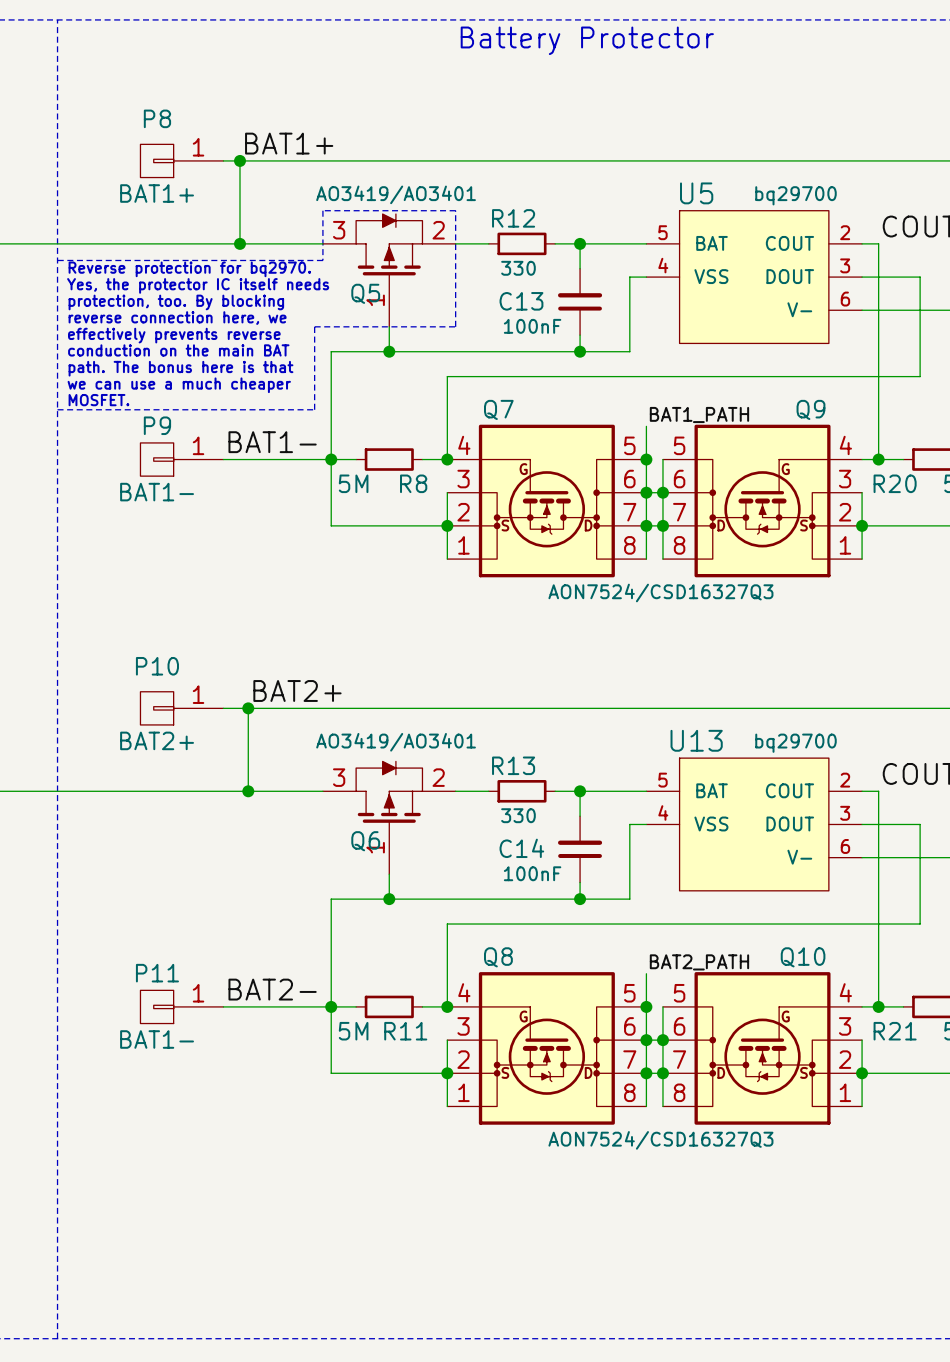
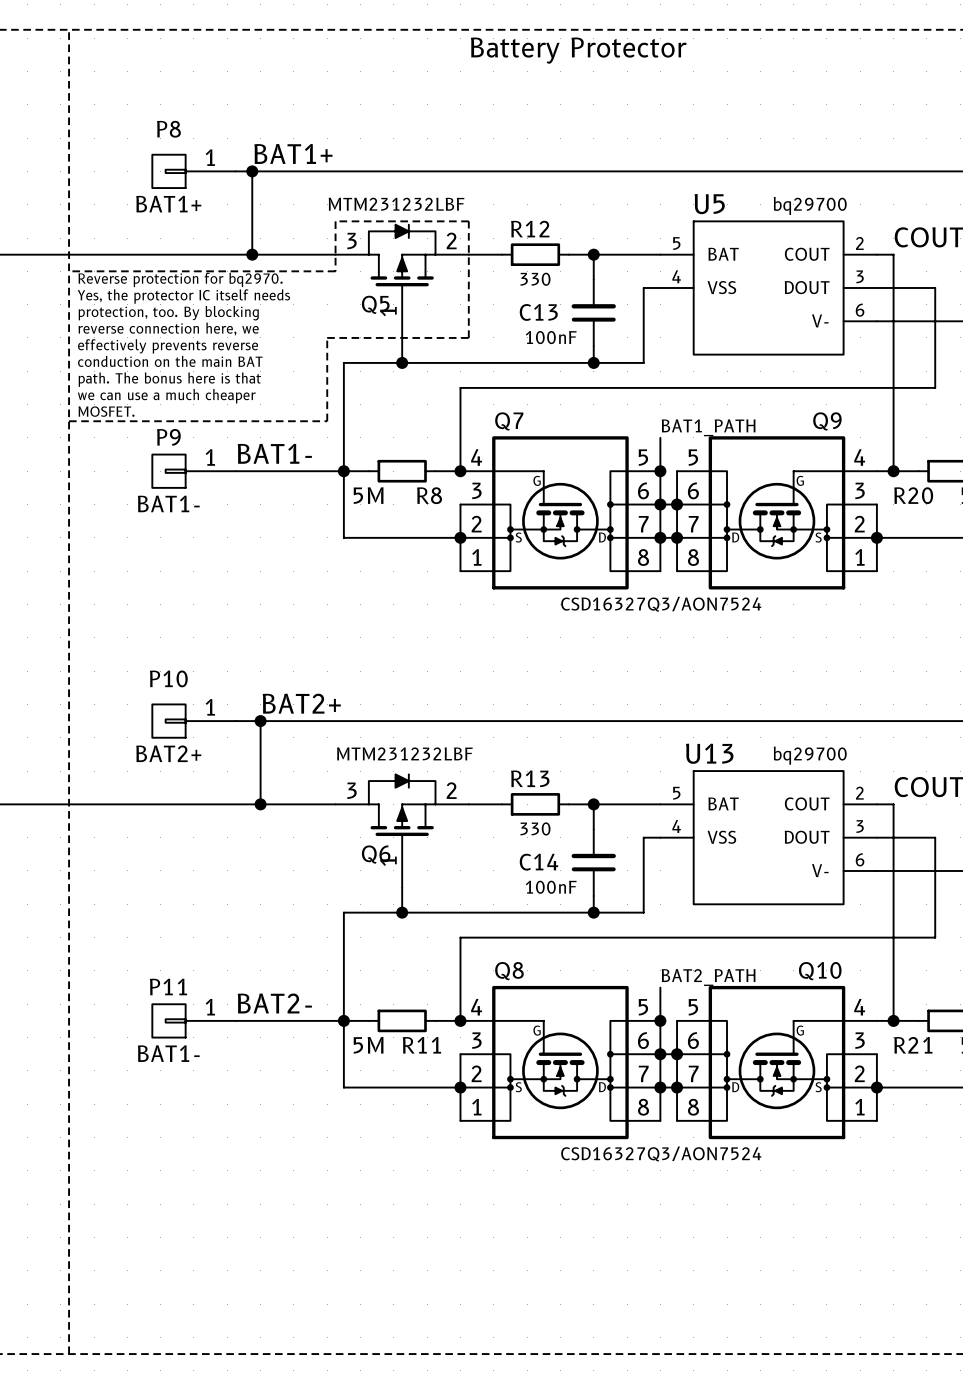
Q5 value: AO3419/AO3401 (396, 194) -> MTM231232LBF (396, 204)
Q7 value: AON7524/CSD16327Q3 (660, 592) -> CSD16327Q3/AON7524 (661, 604)
Q6 value: AO3419/AO3401 (396, 742) -> MTM231232LBF (404, 753)
Q8 value: AON7524/CSD16327Q3 (660, 1140) -> CSD16327Q3/AON7524 (661, 1153)

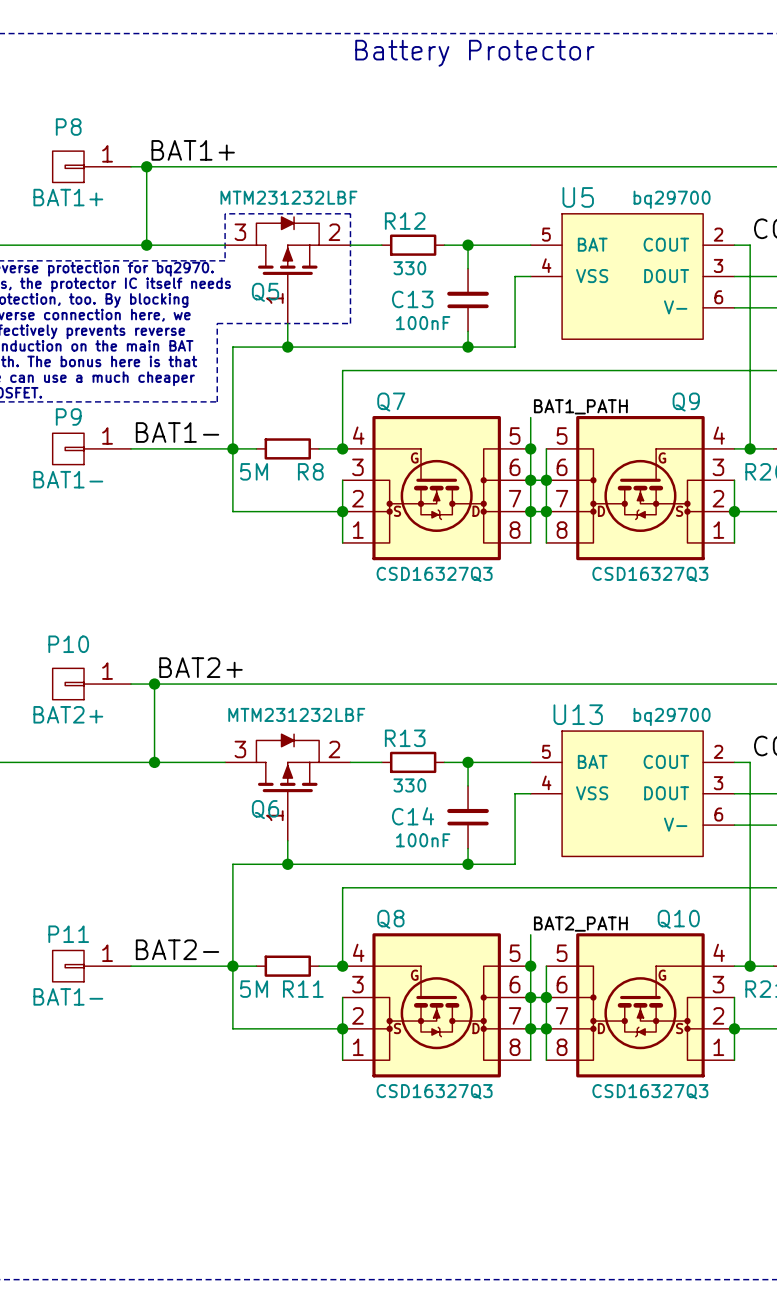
Q7 value: CSD16327Q3/AON7524 (661, 604) -> CSD16327Q3 (434, 574)
Q9 value: none -> CSD16327Q3 (650, 574)
Q8 value: CSD16327Q3/AON7524 (661, 1153) -> CSD16327Q3 (434, 1091)
Q10 value: none -> CSD16327Q3 (650, 1091)

